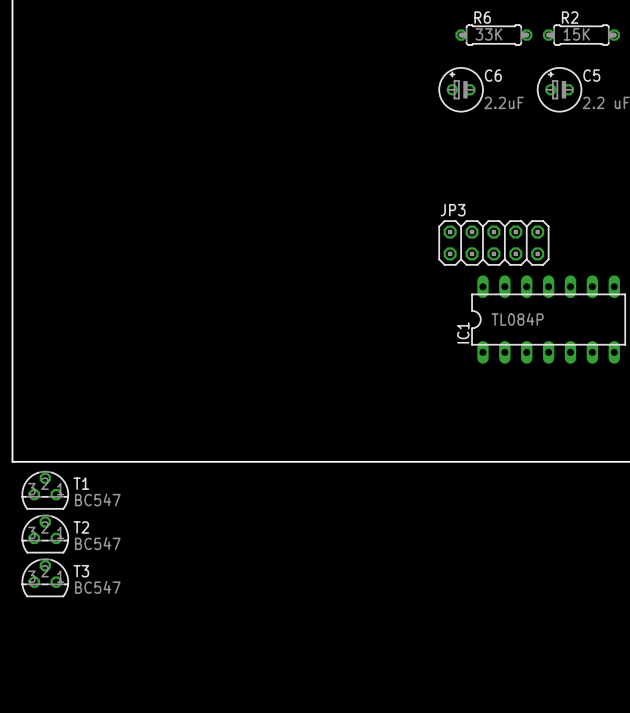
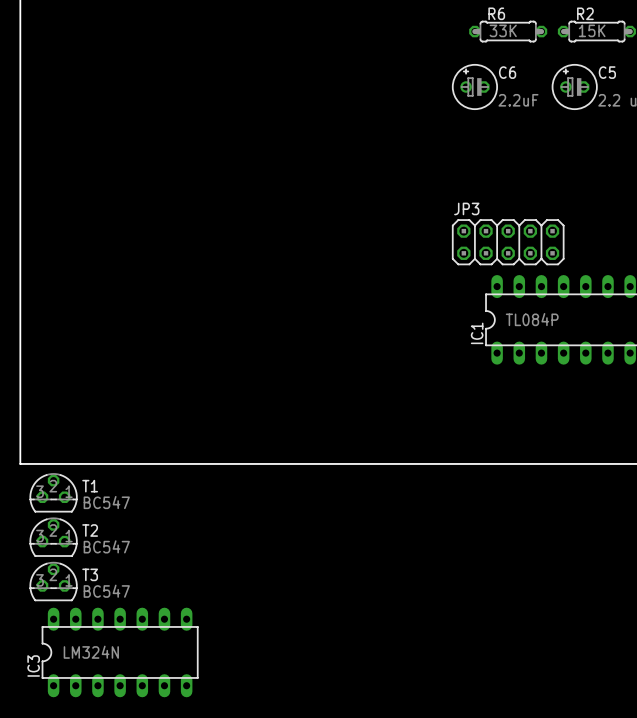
IC3: none -> LM324N (120, 652)

